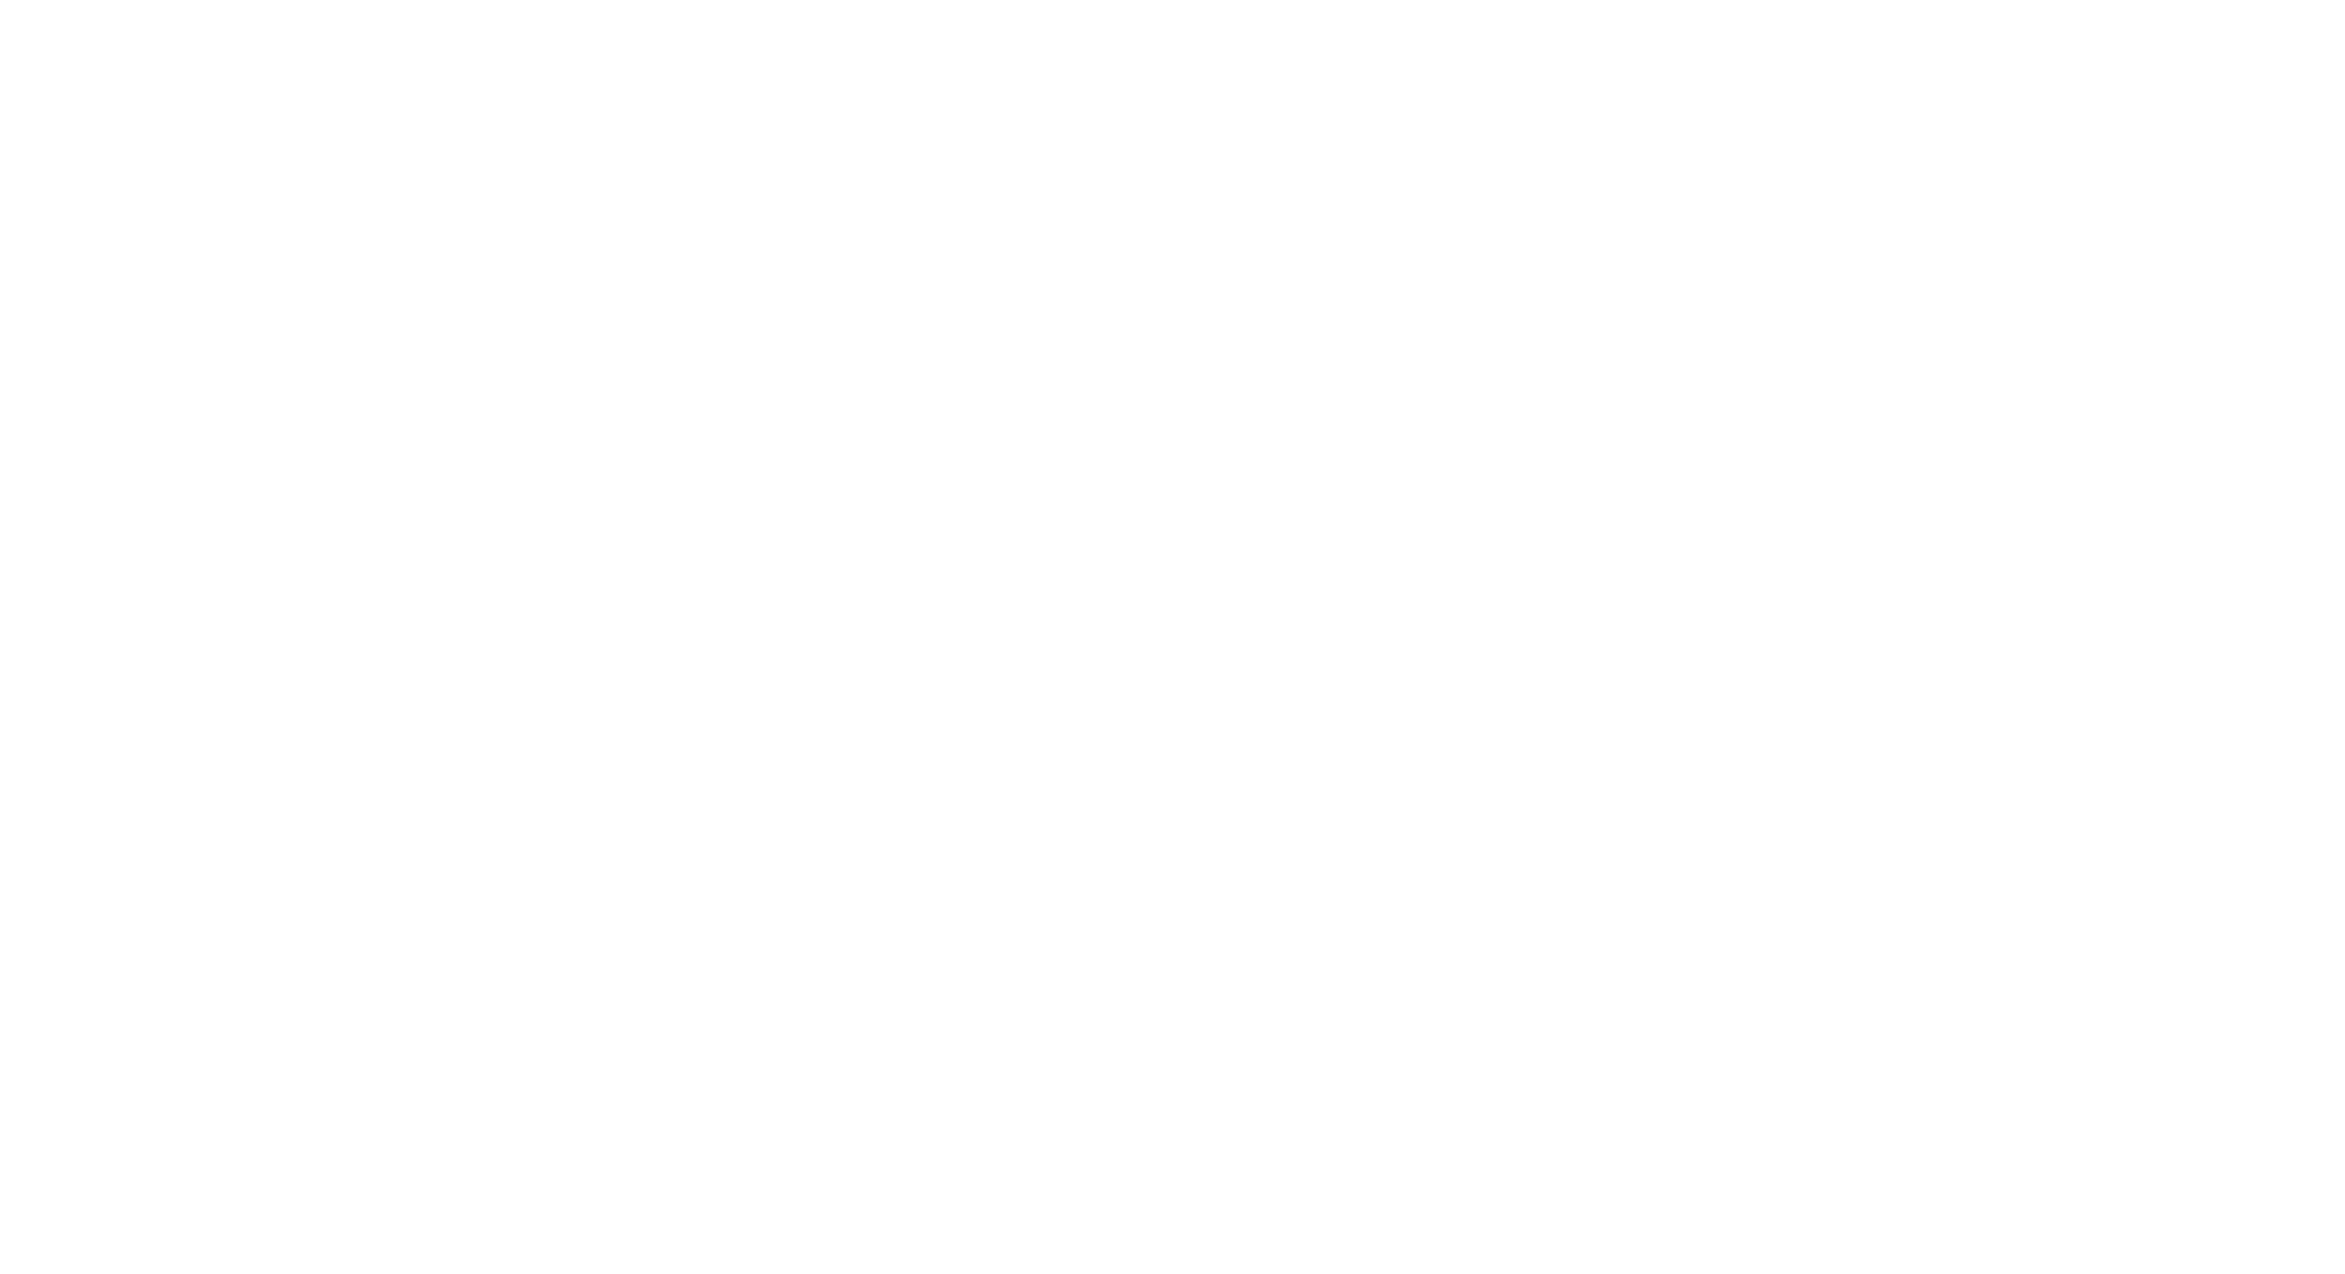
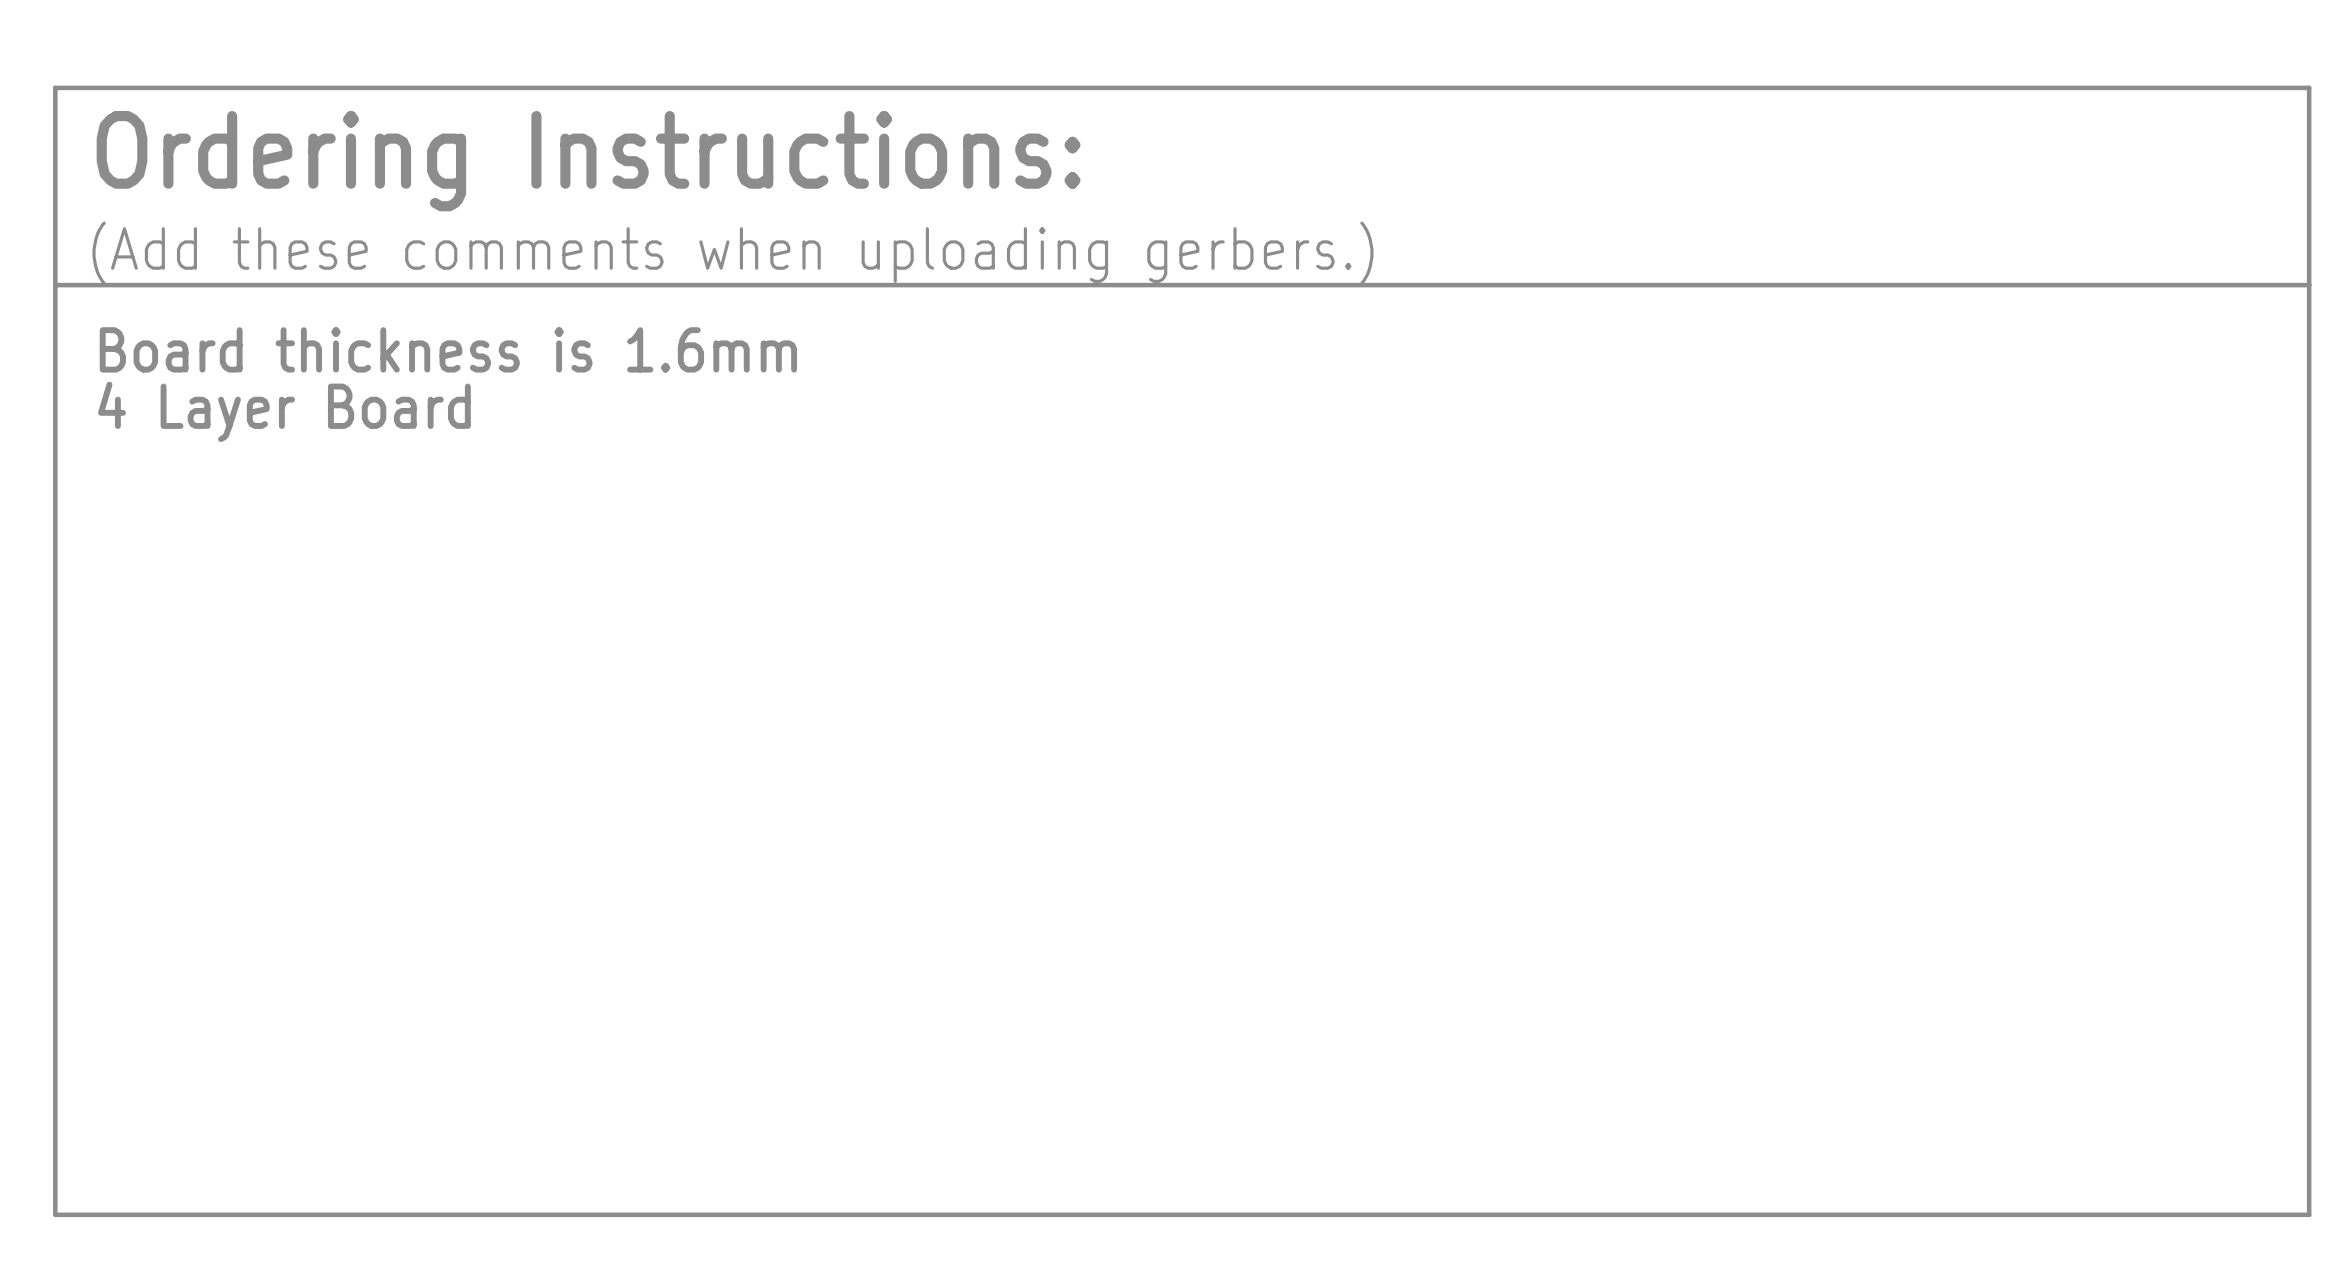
drawing: none -> [53, 85, 2312, 1218]
text: none -> Board thickness is 1.6mm (448, 349)
text: none -> 4 Layer Board (284, 411)

